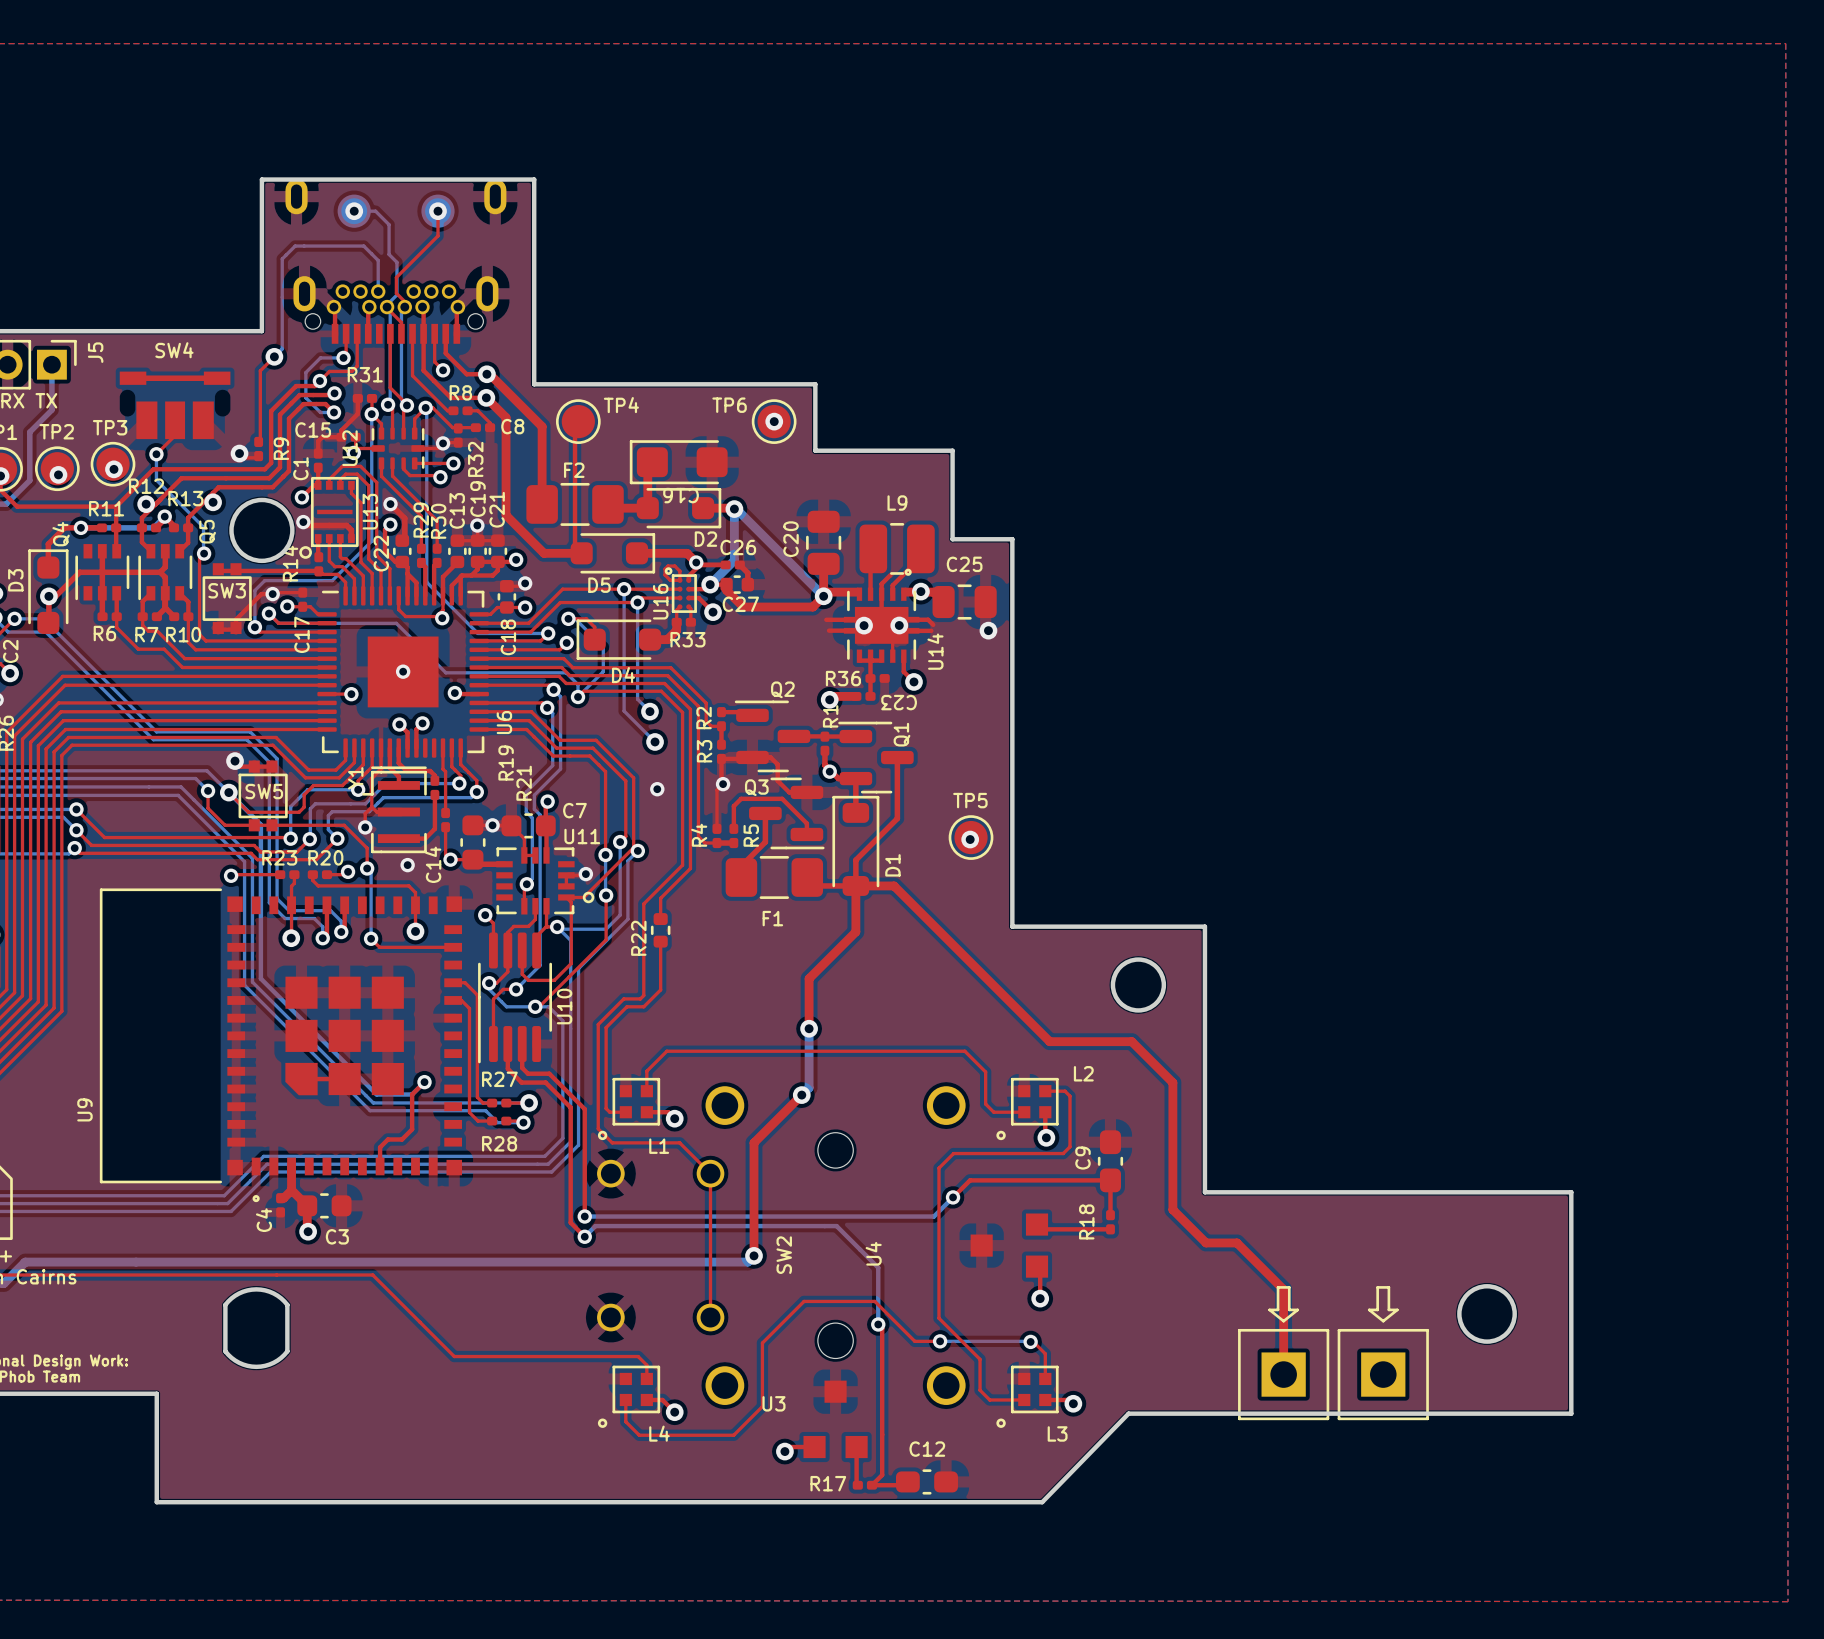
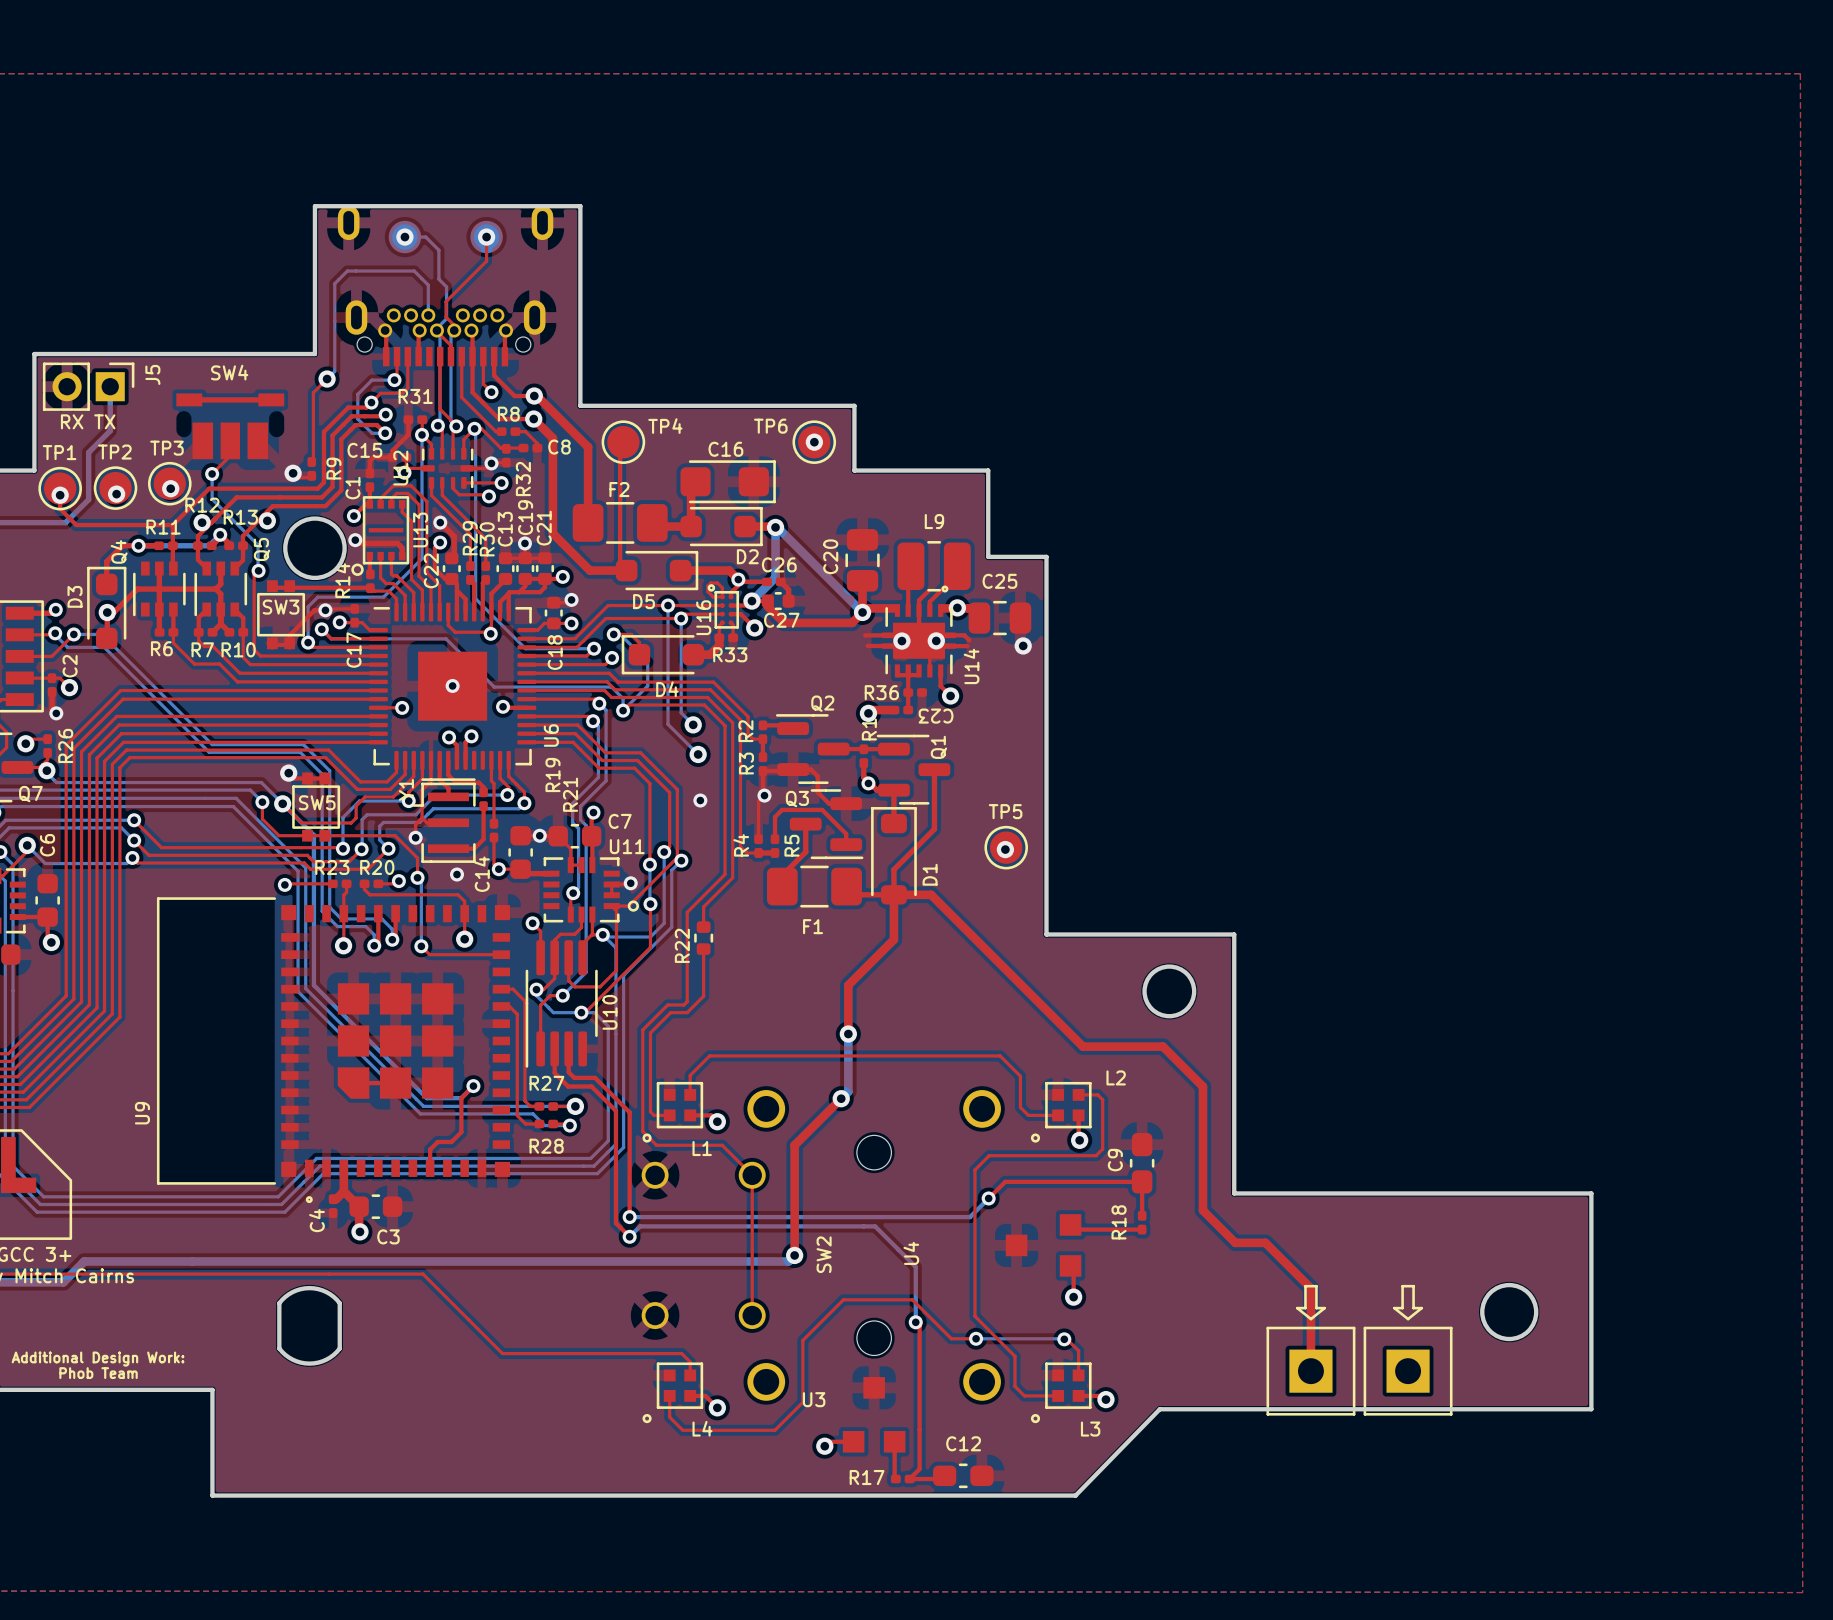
C16 rotation: 0° (678, 462) -> 180° (728, 481)

